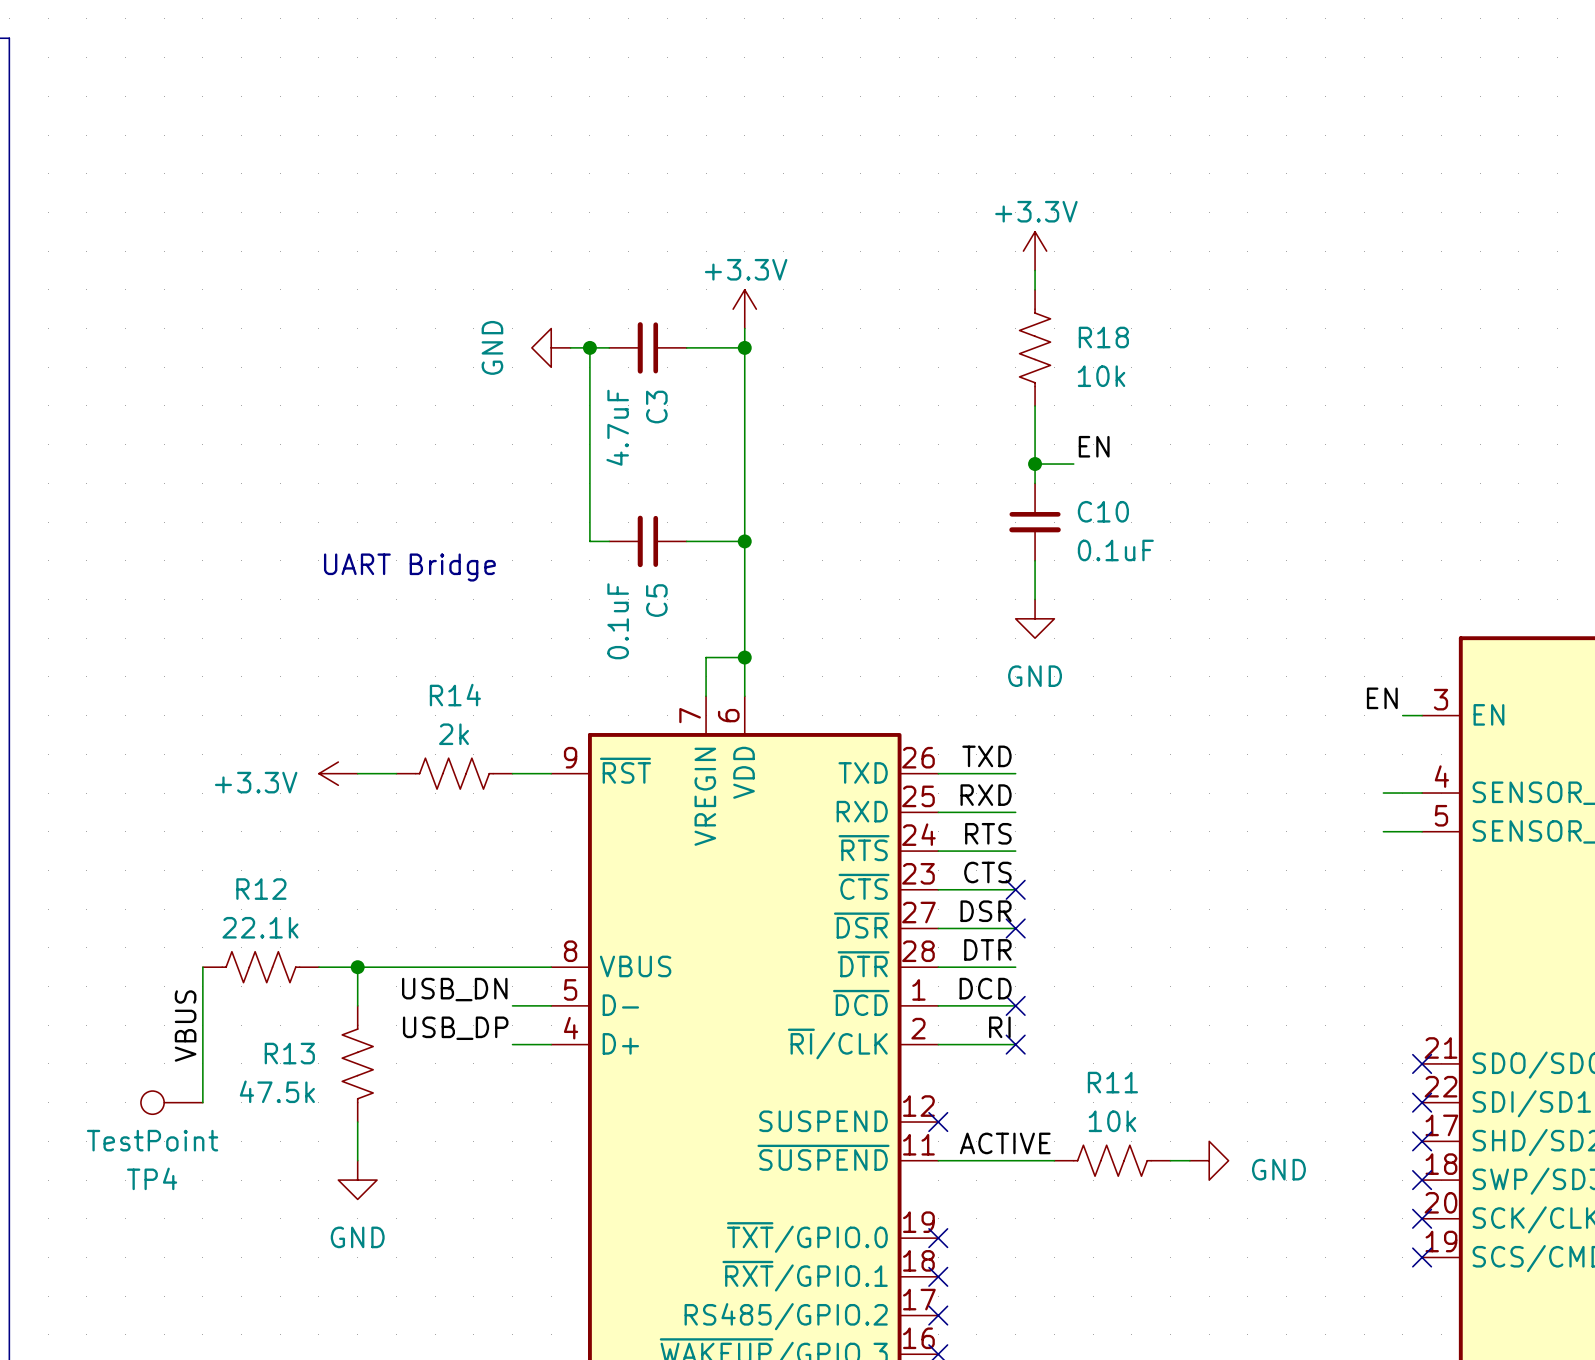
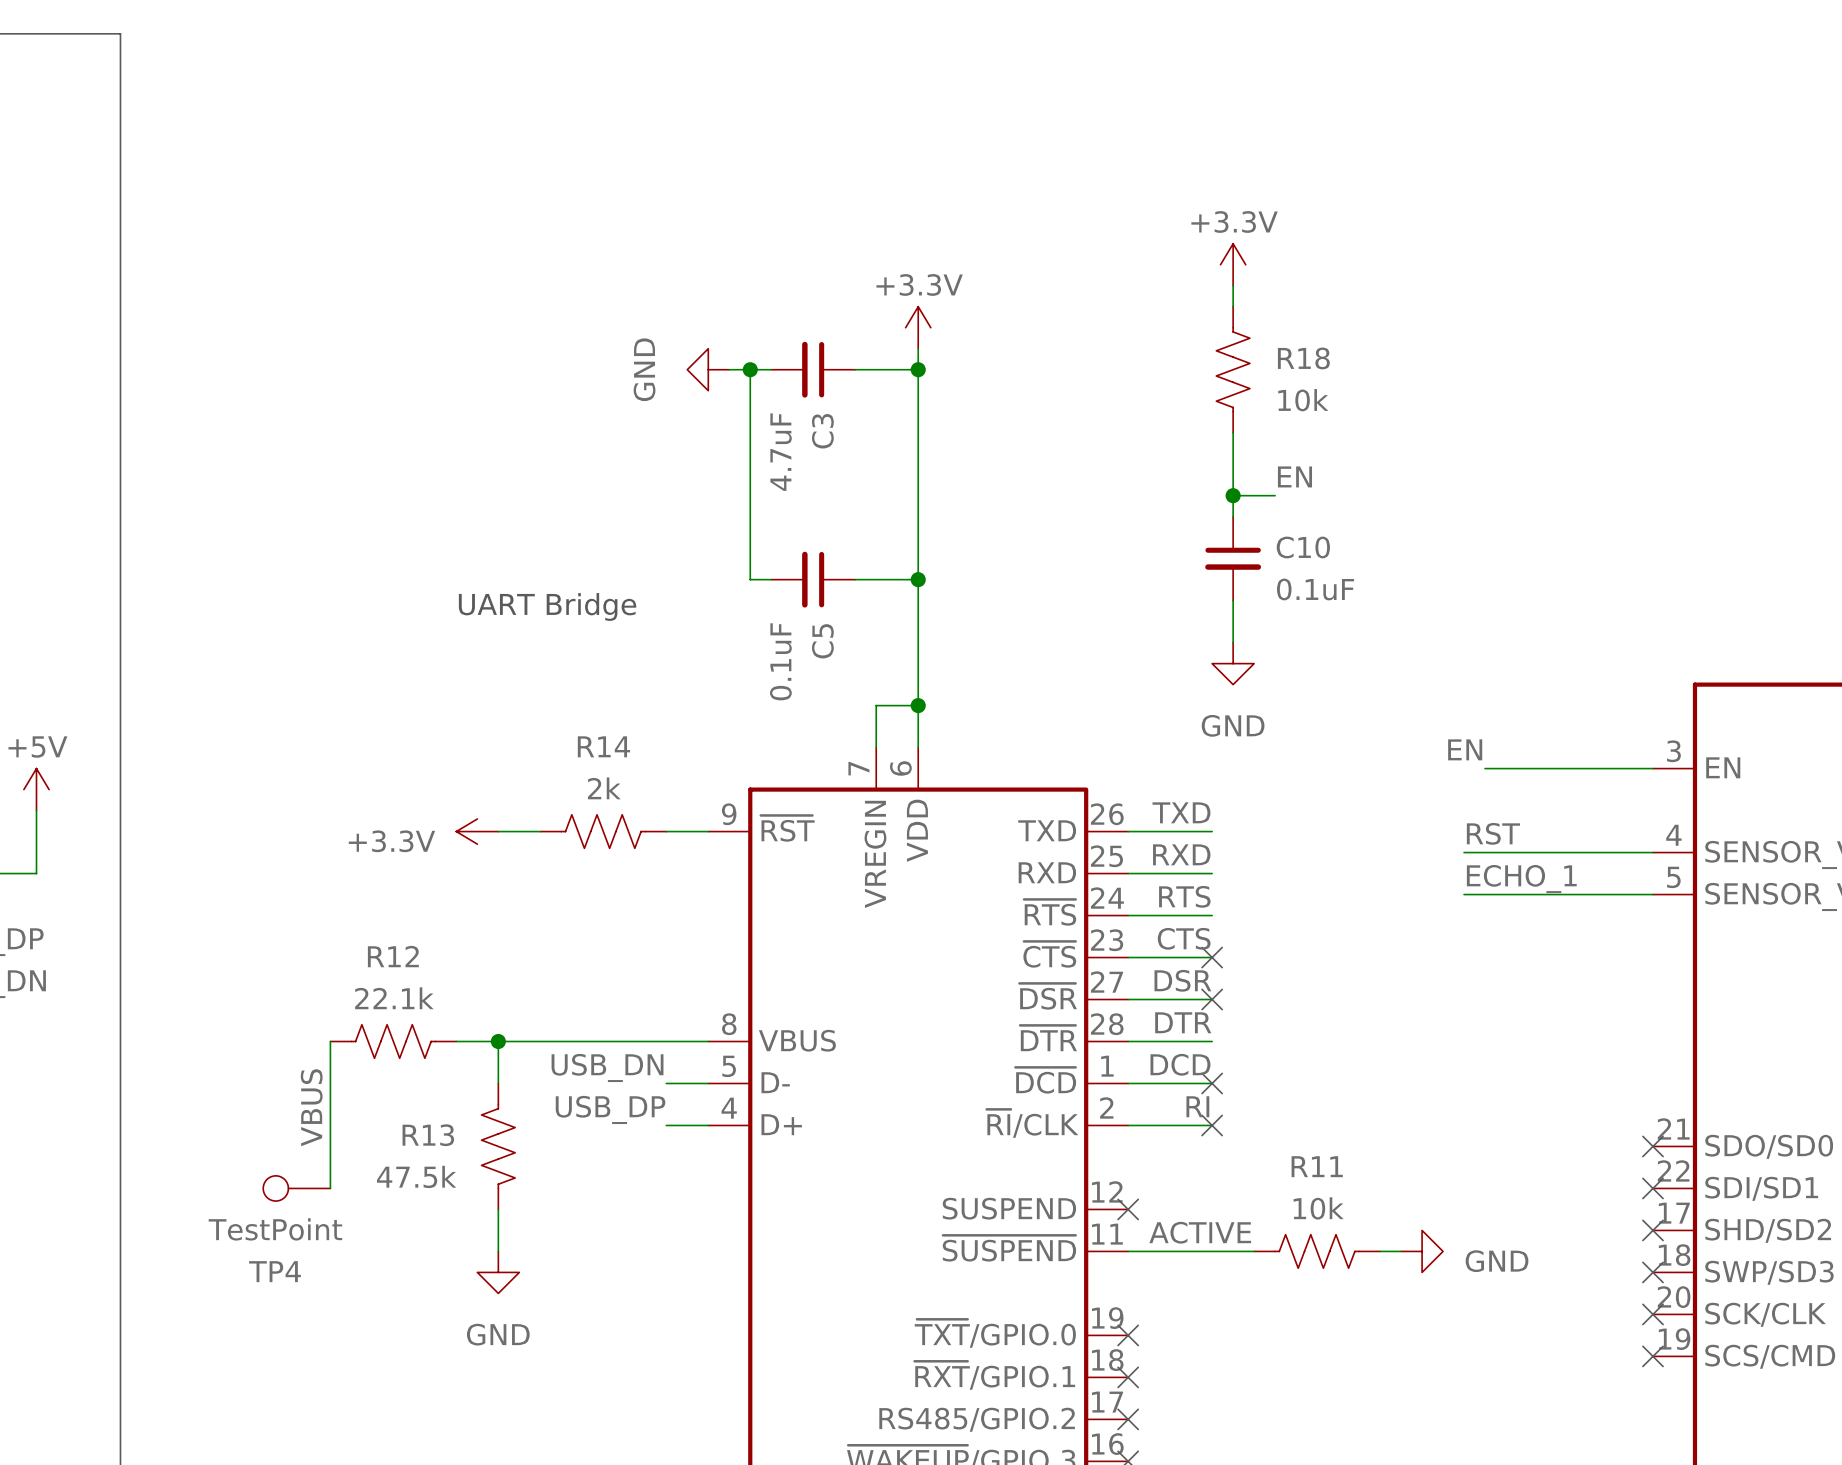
label position: EN (1382, 698) -> EN (1465, 749)
wire: none -> (1485, 768) (1632, 768)
label: none -> RST (1493, 833)
wire: none -> (1464, 852) (1611, 852)
label: none -> ECHO_1 (1521, 879)
wire: none -> (1464, 894) (1611, 894)

